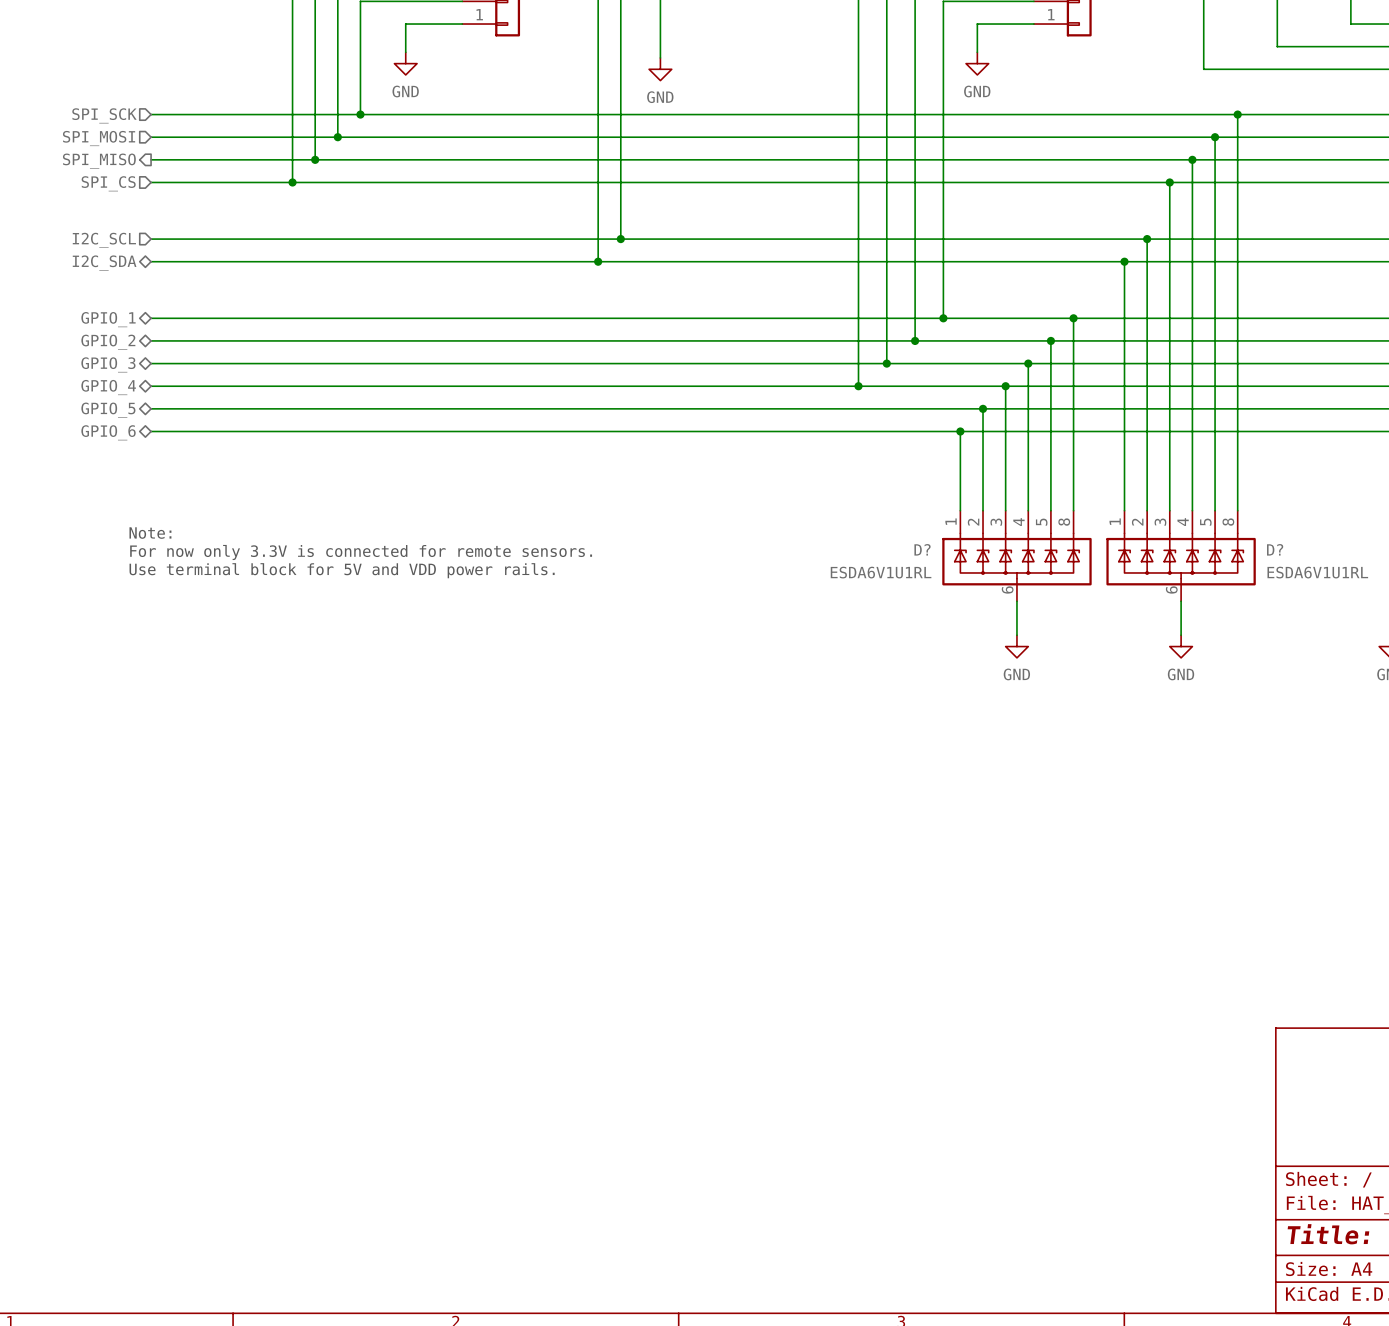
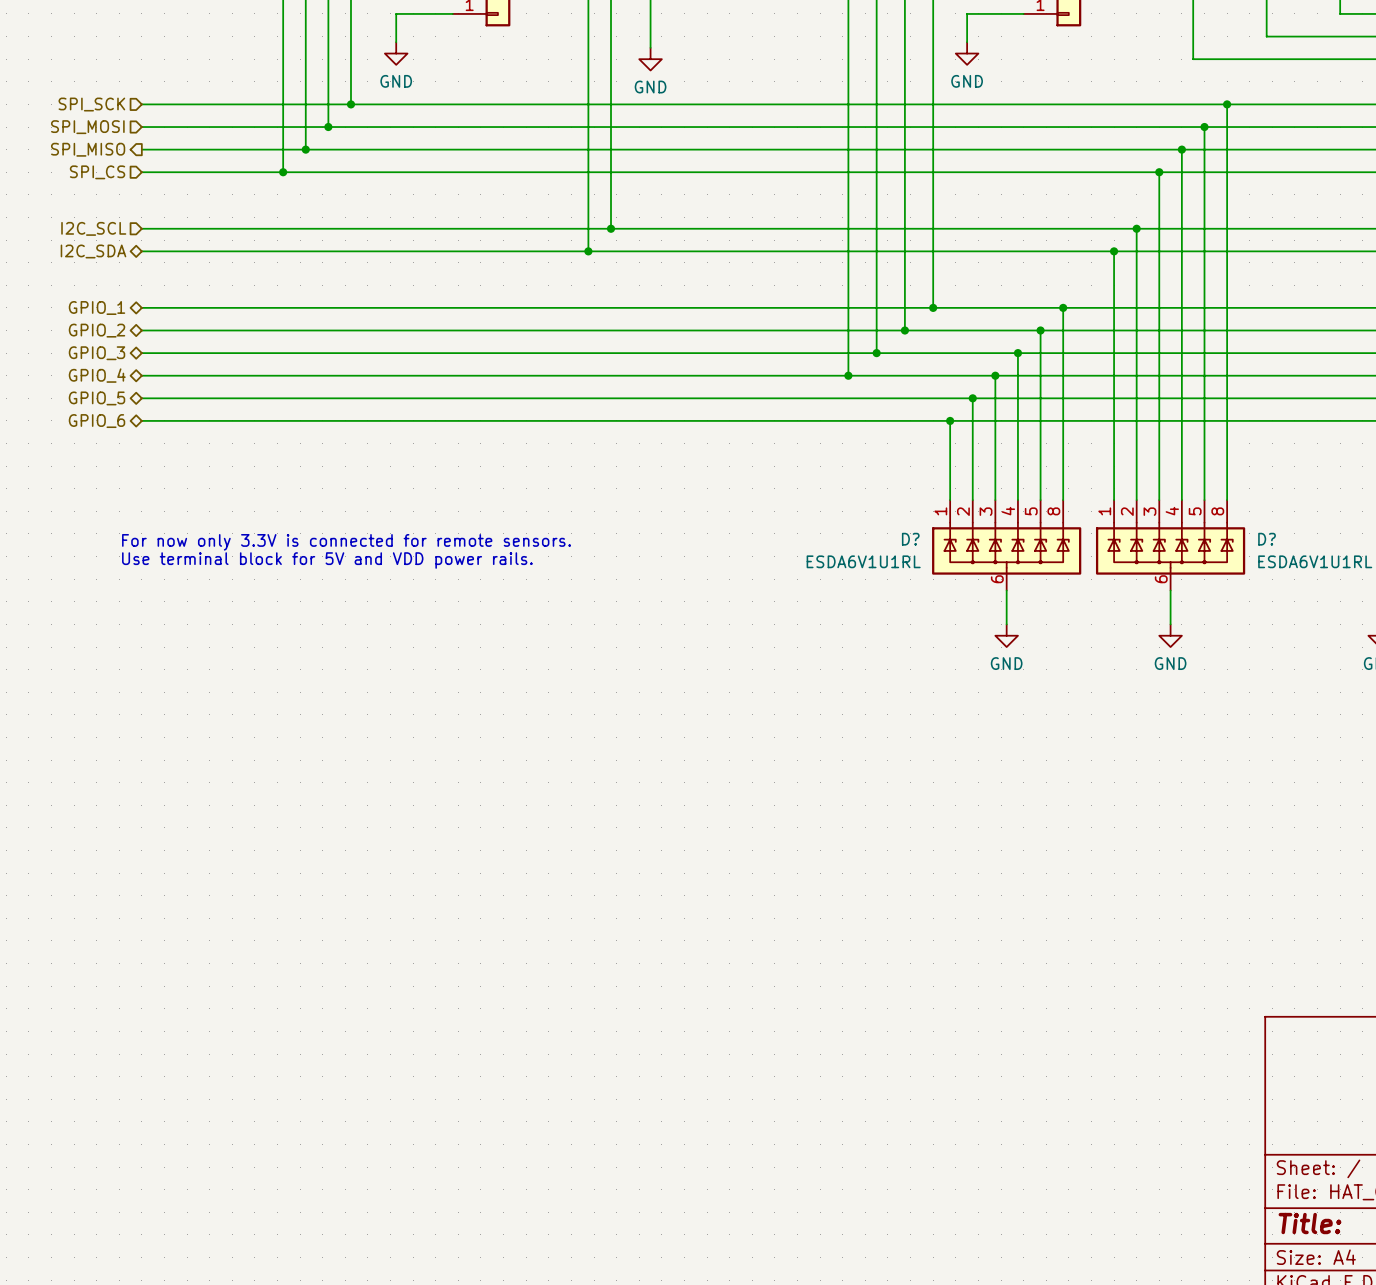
text: Note: (150, 533) -> none

